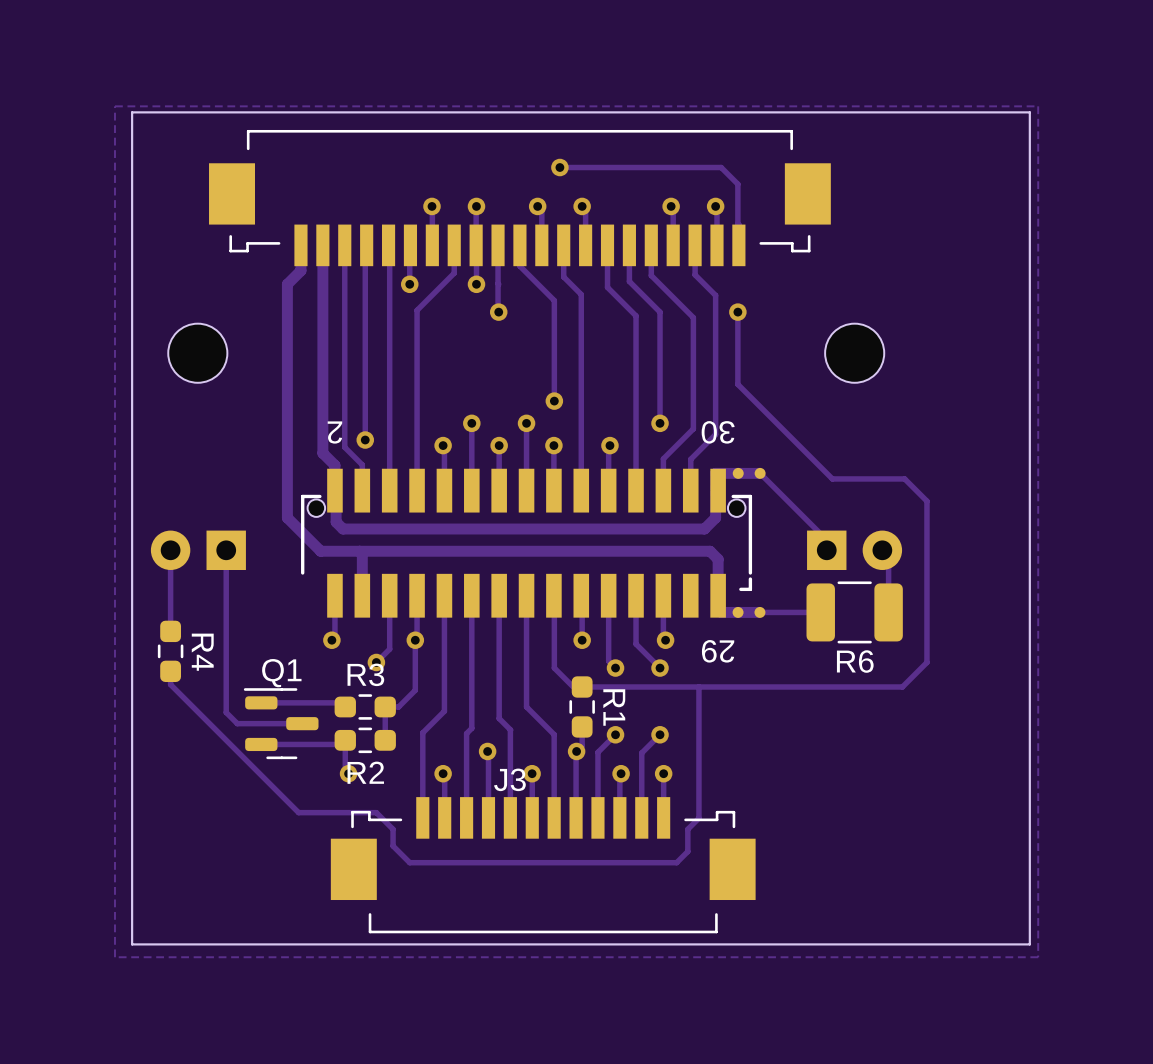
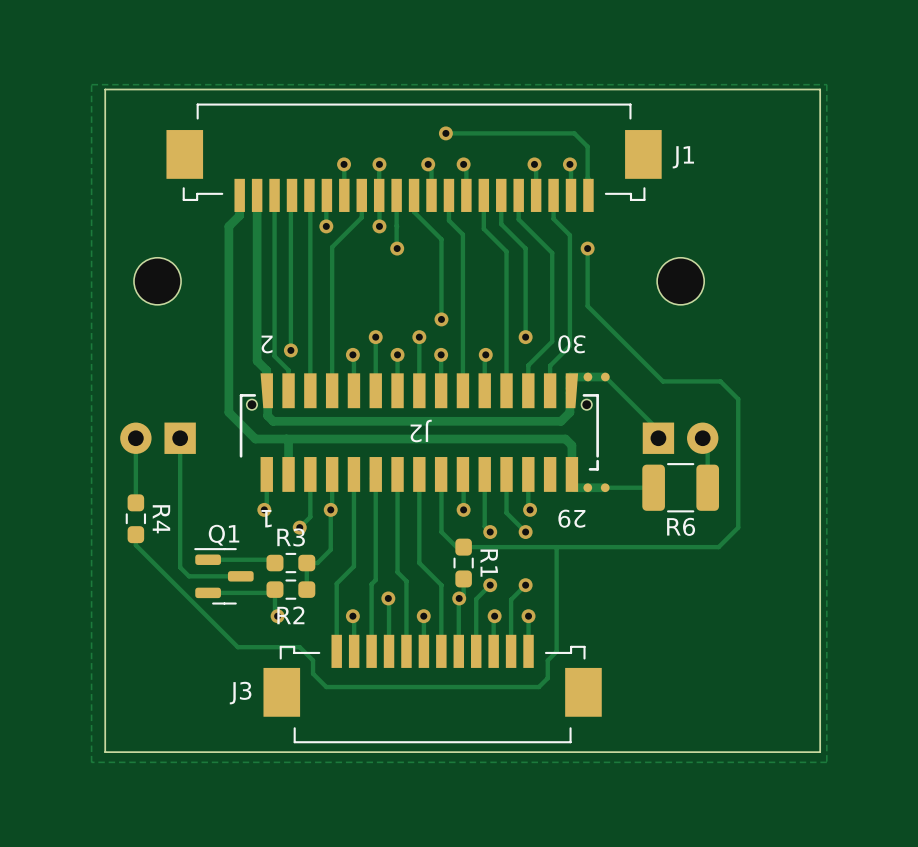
J1 name: none -> J1 (683, 157)
part: (526, 543) -> none
J2: none -> (419, 432)
J3 name position: J3 (509, 779) -> J3 (240, 693)

